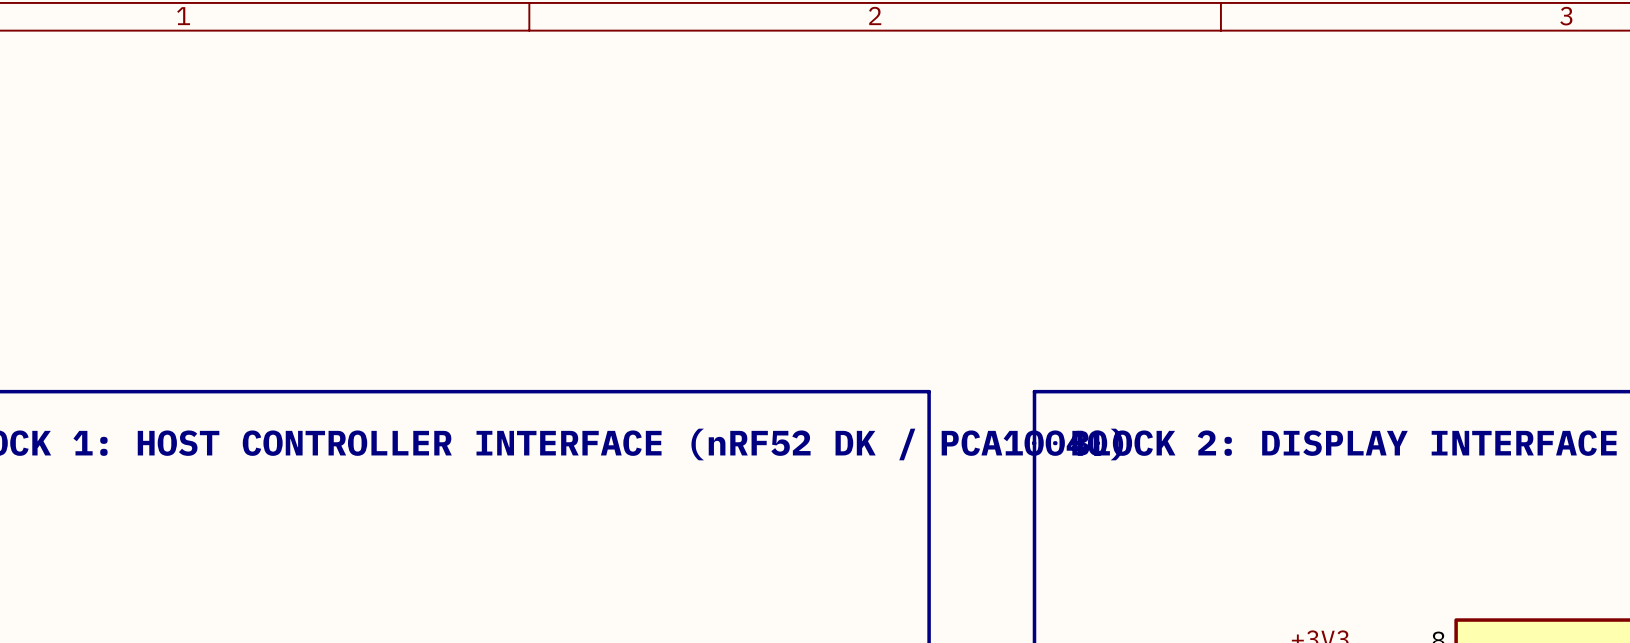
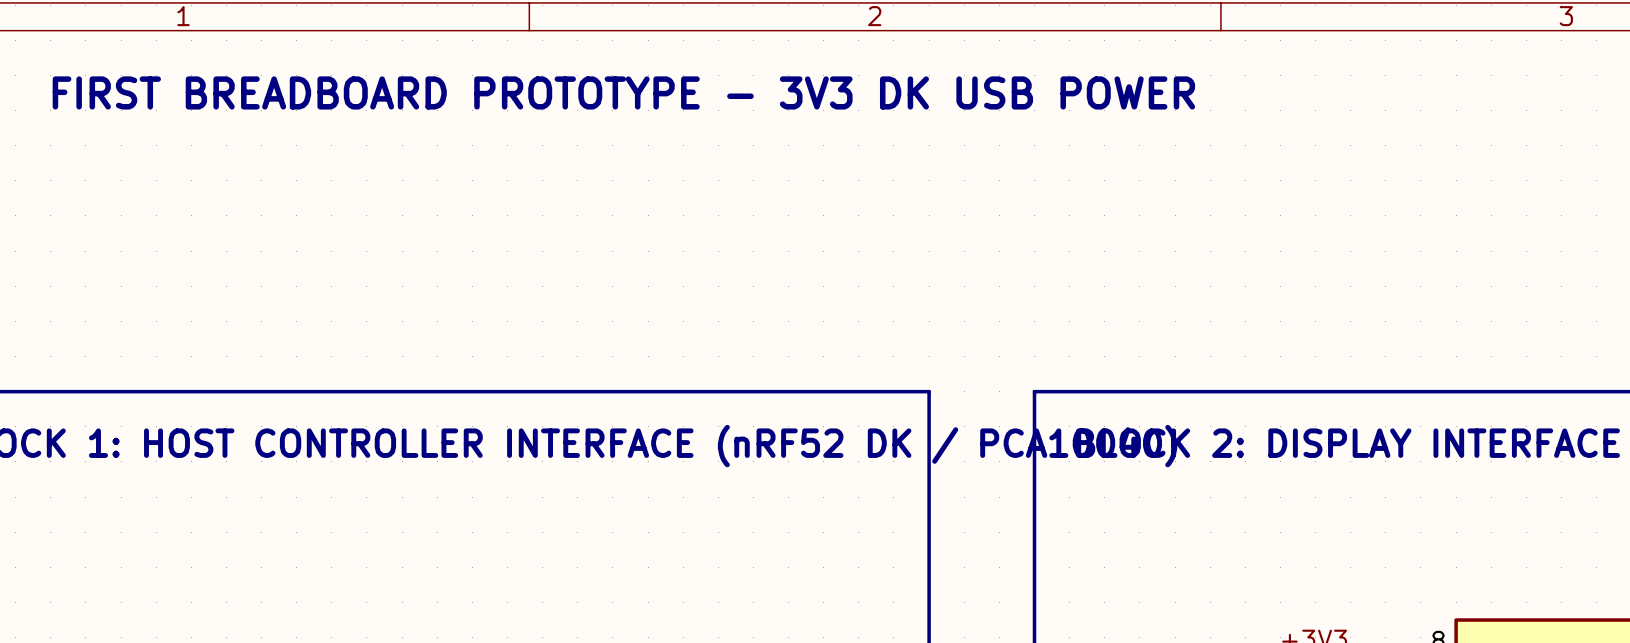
text: none -> FIRST BREADBOARD PROTOTYPE - 3V3 DK USB POWER (623, 92)

